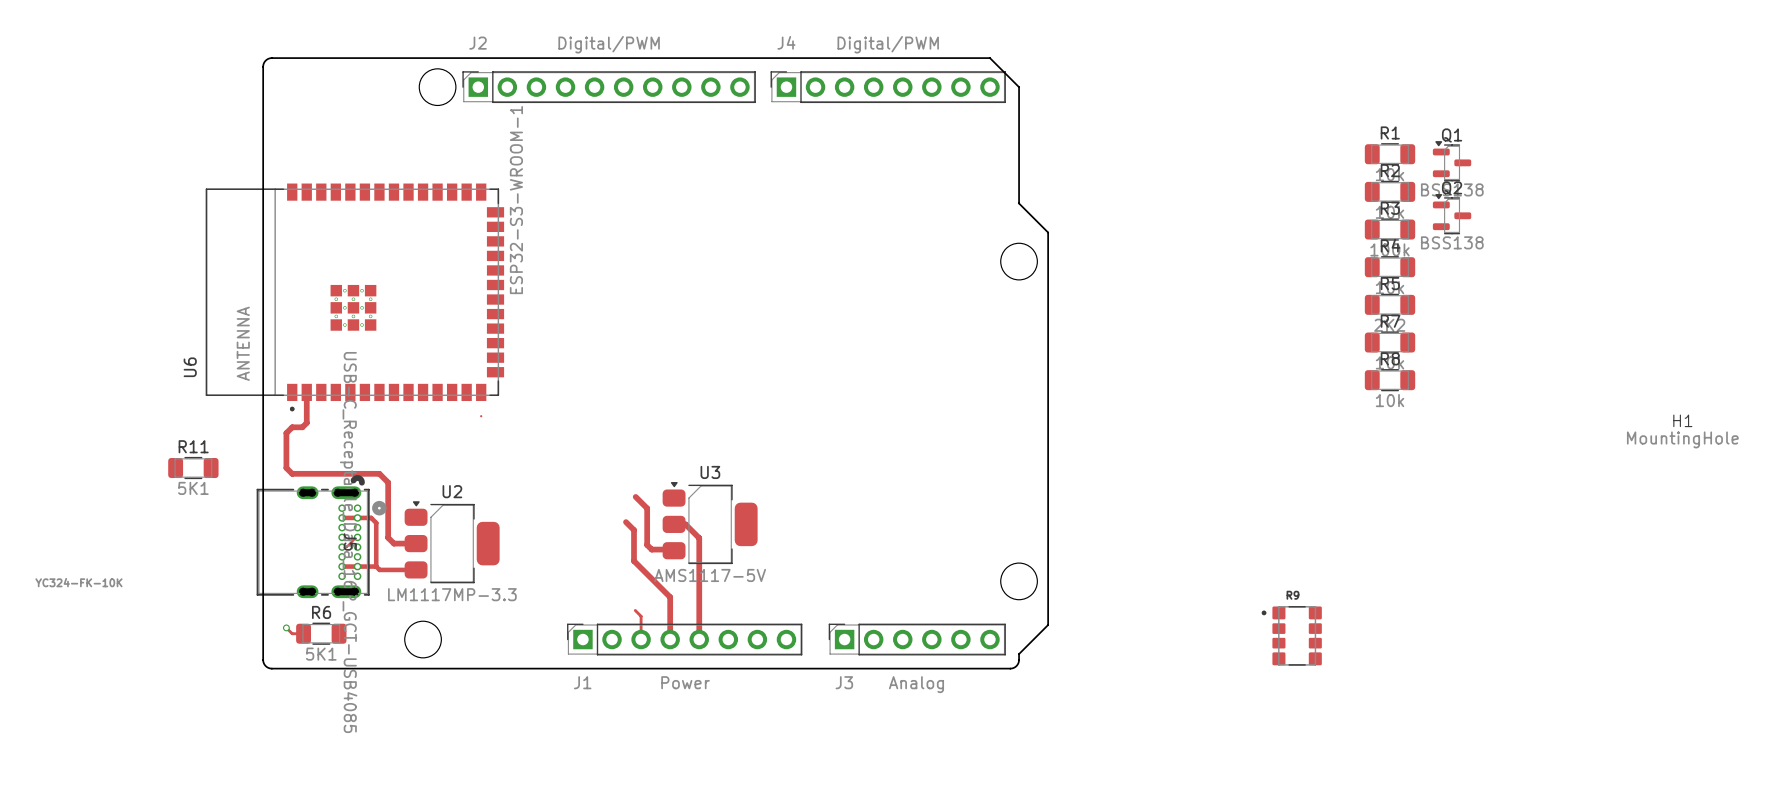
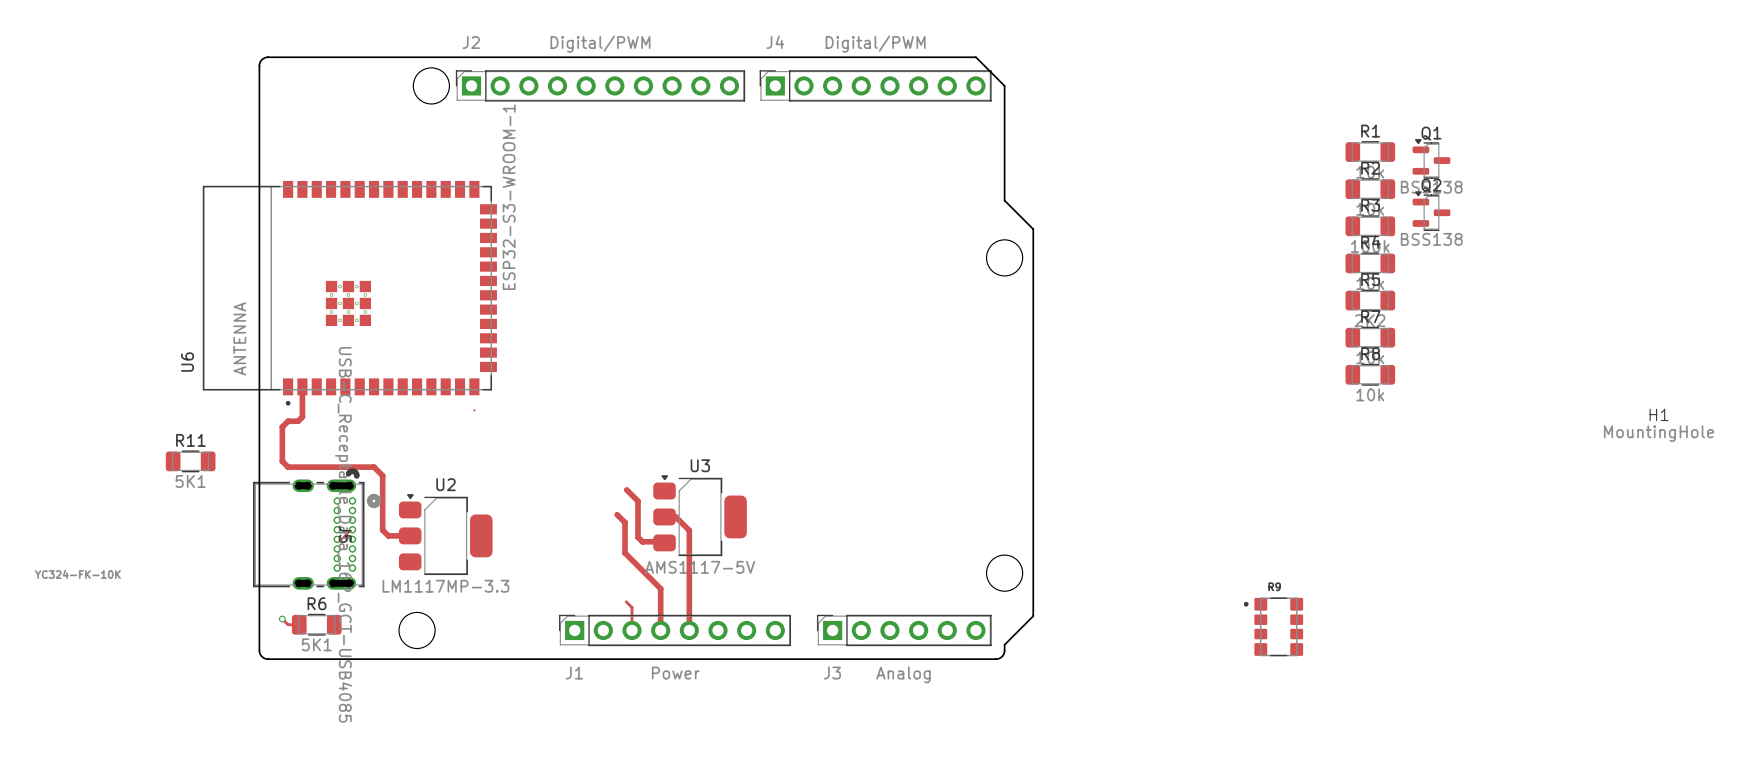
track: (342, 517) (371, 517) (376, 522) (376, 566) -> none
track: (342, 566) (376, 566) -> none
track: (376, 566) (379, 569) (416, 569) -> none

